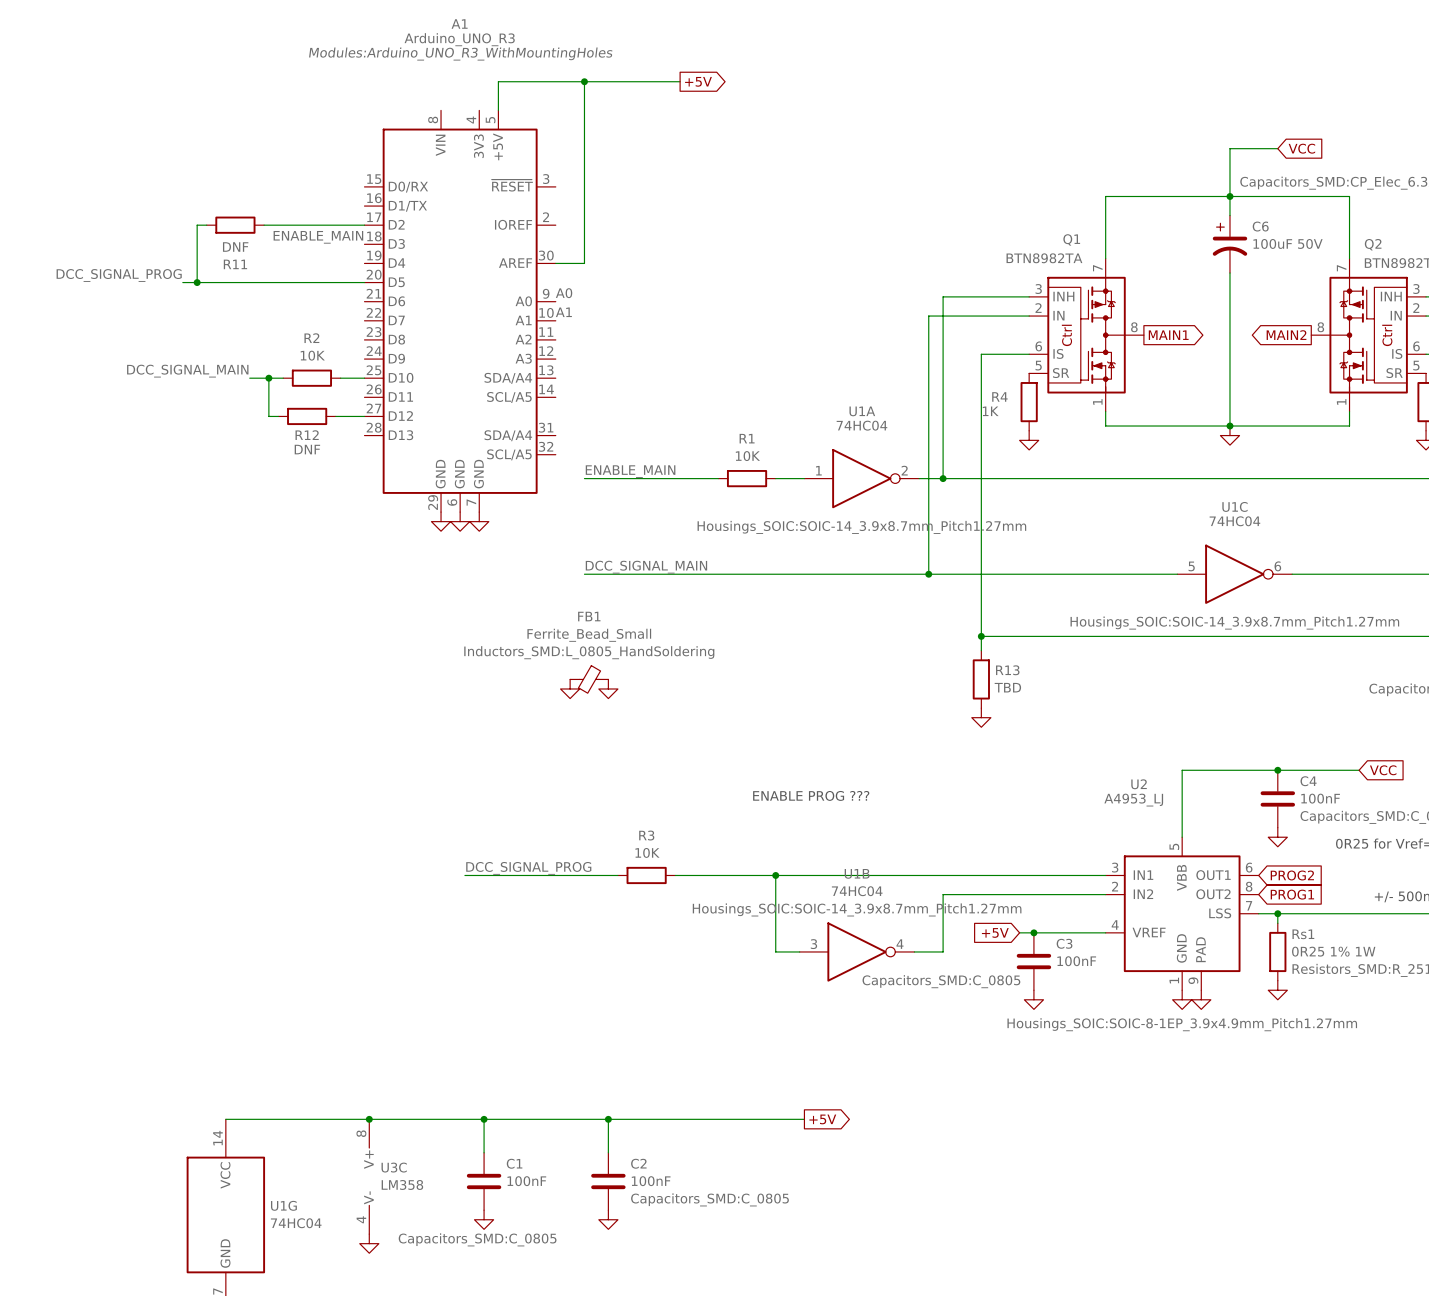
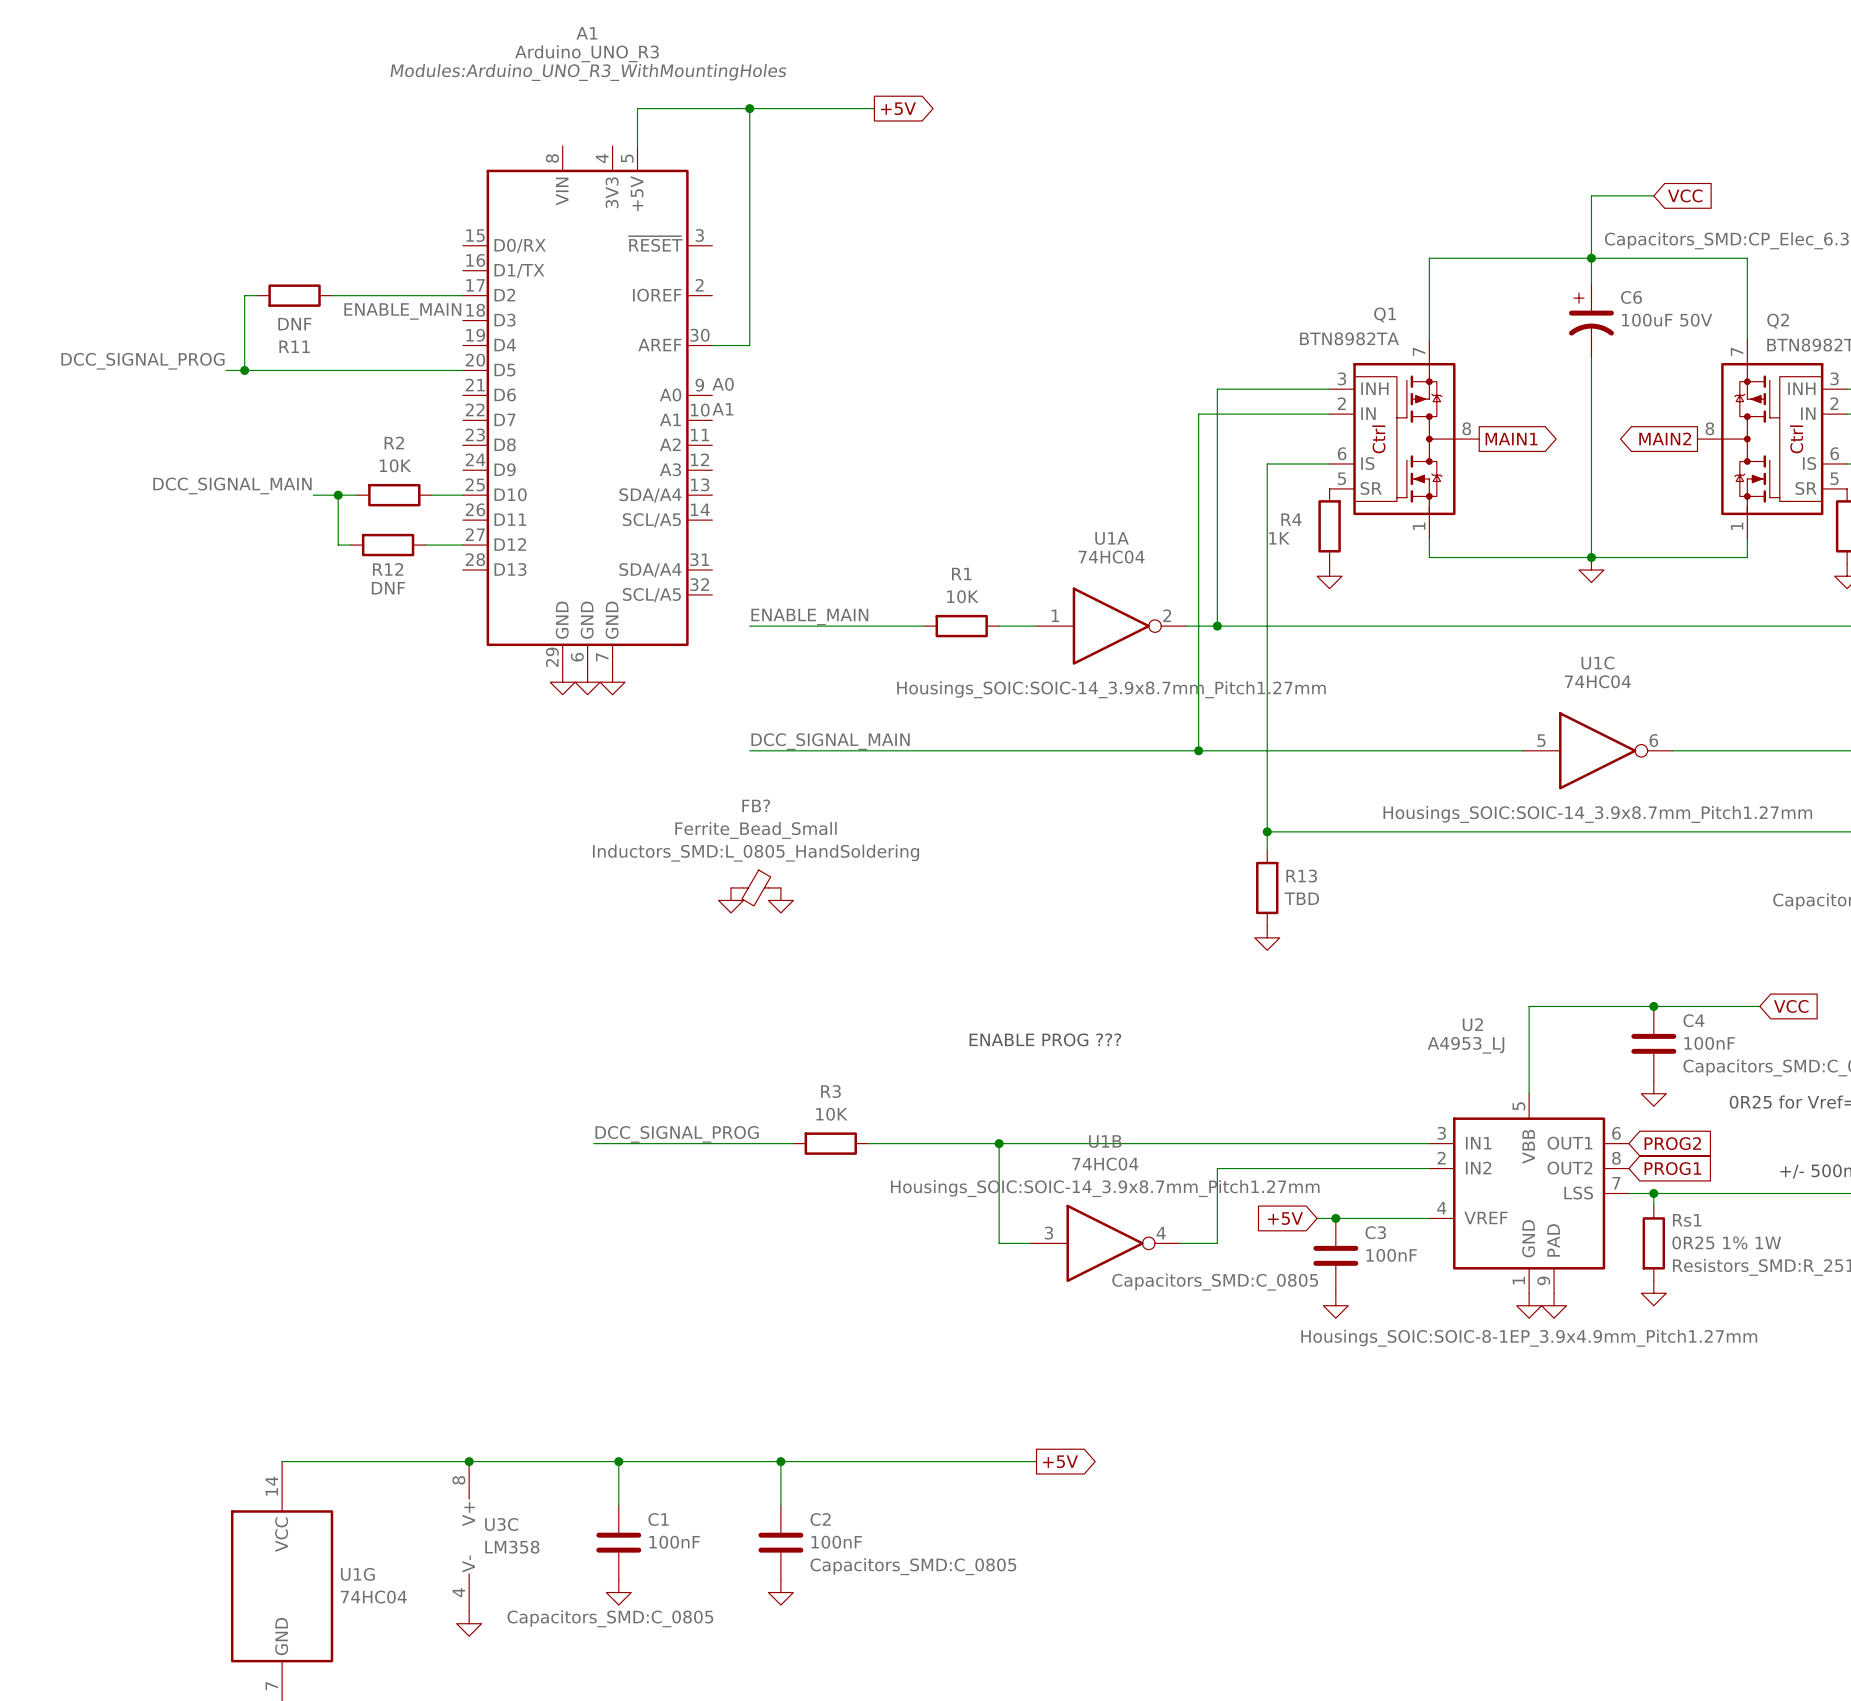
FB1 name: FB1 (589, 616) -> FB? (756, 805)

